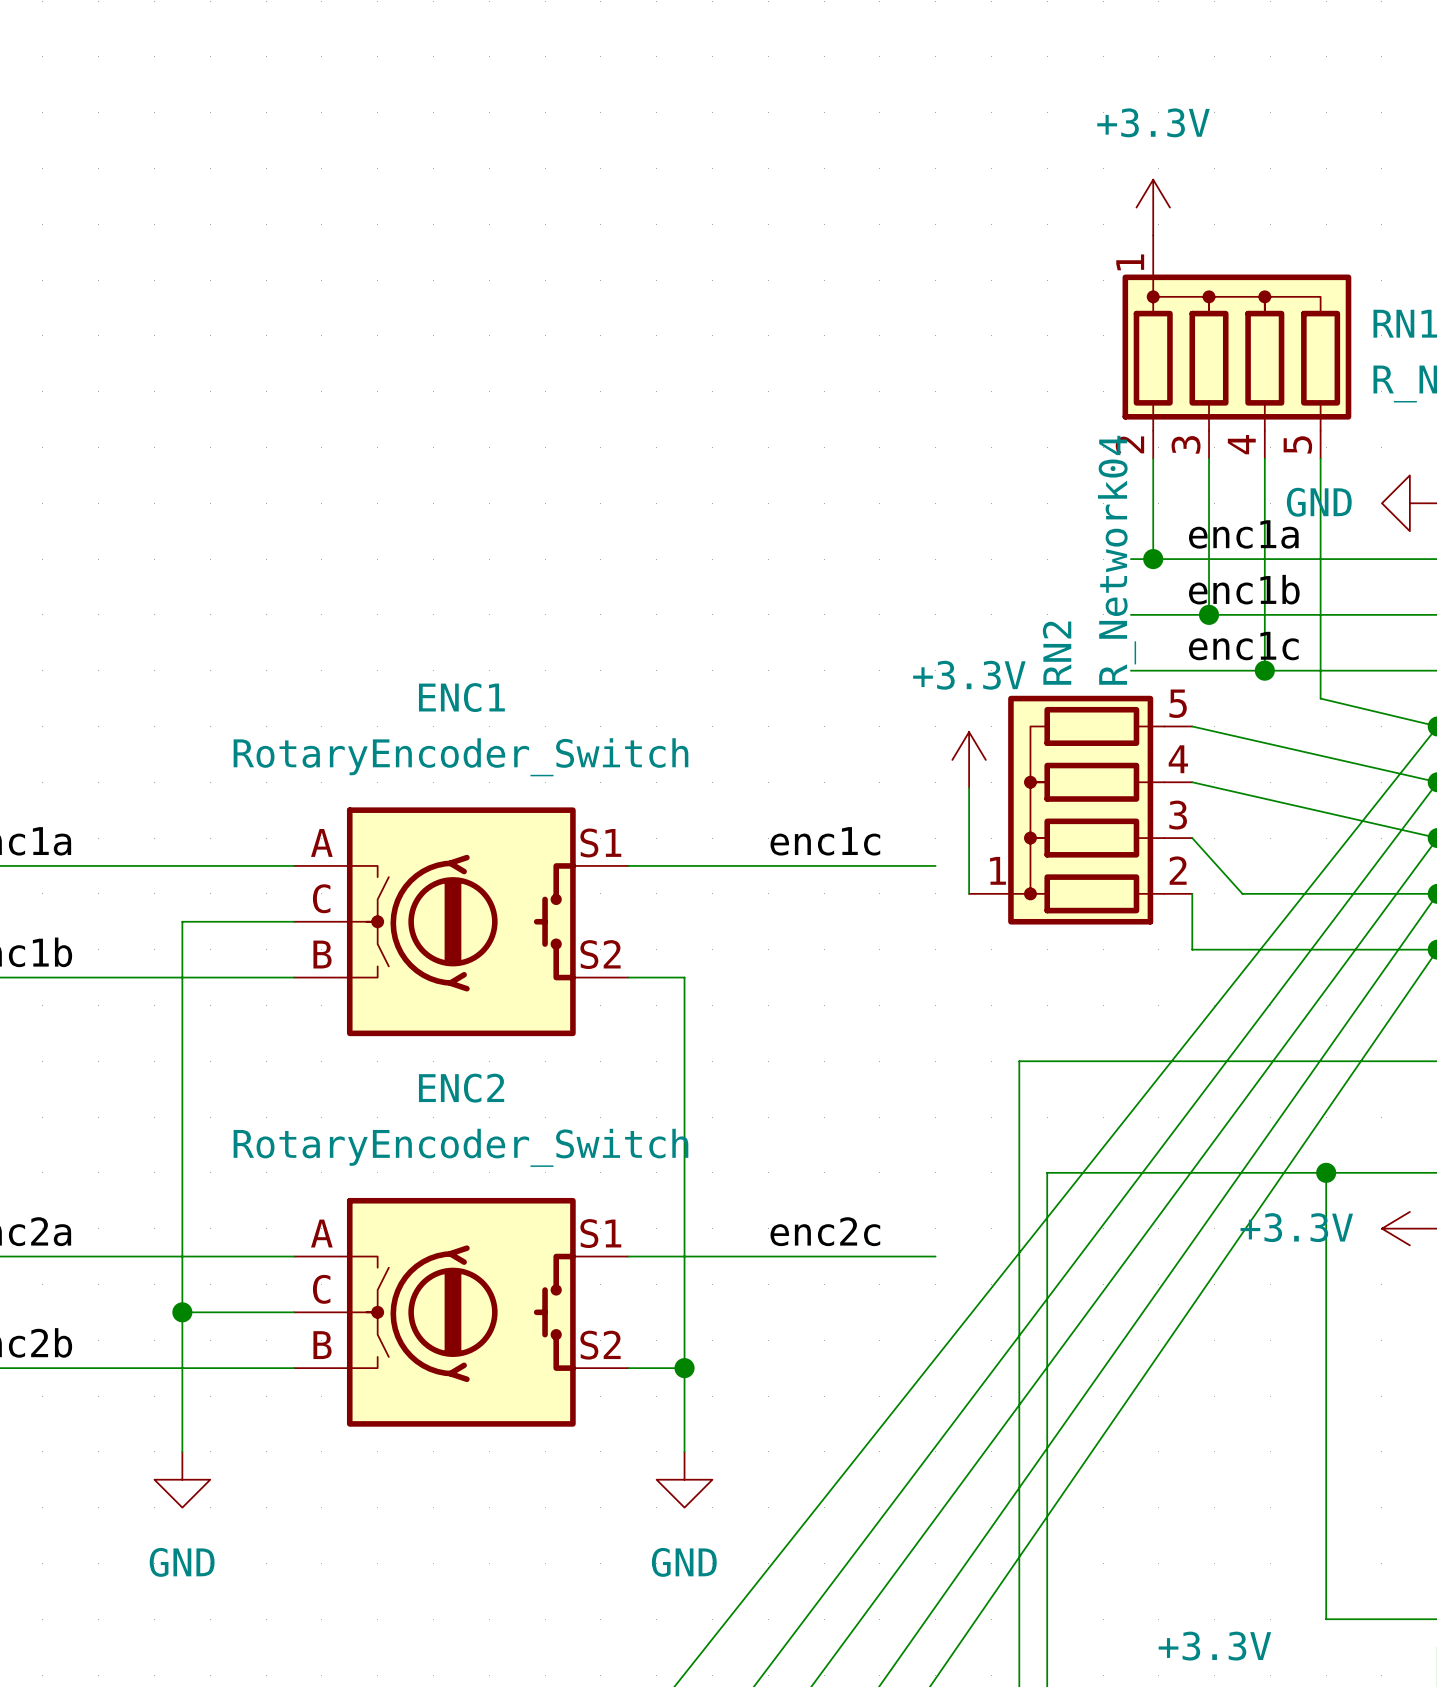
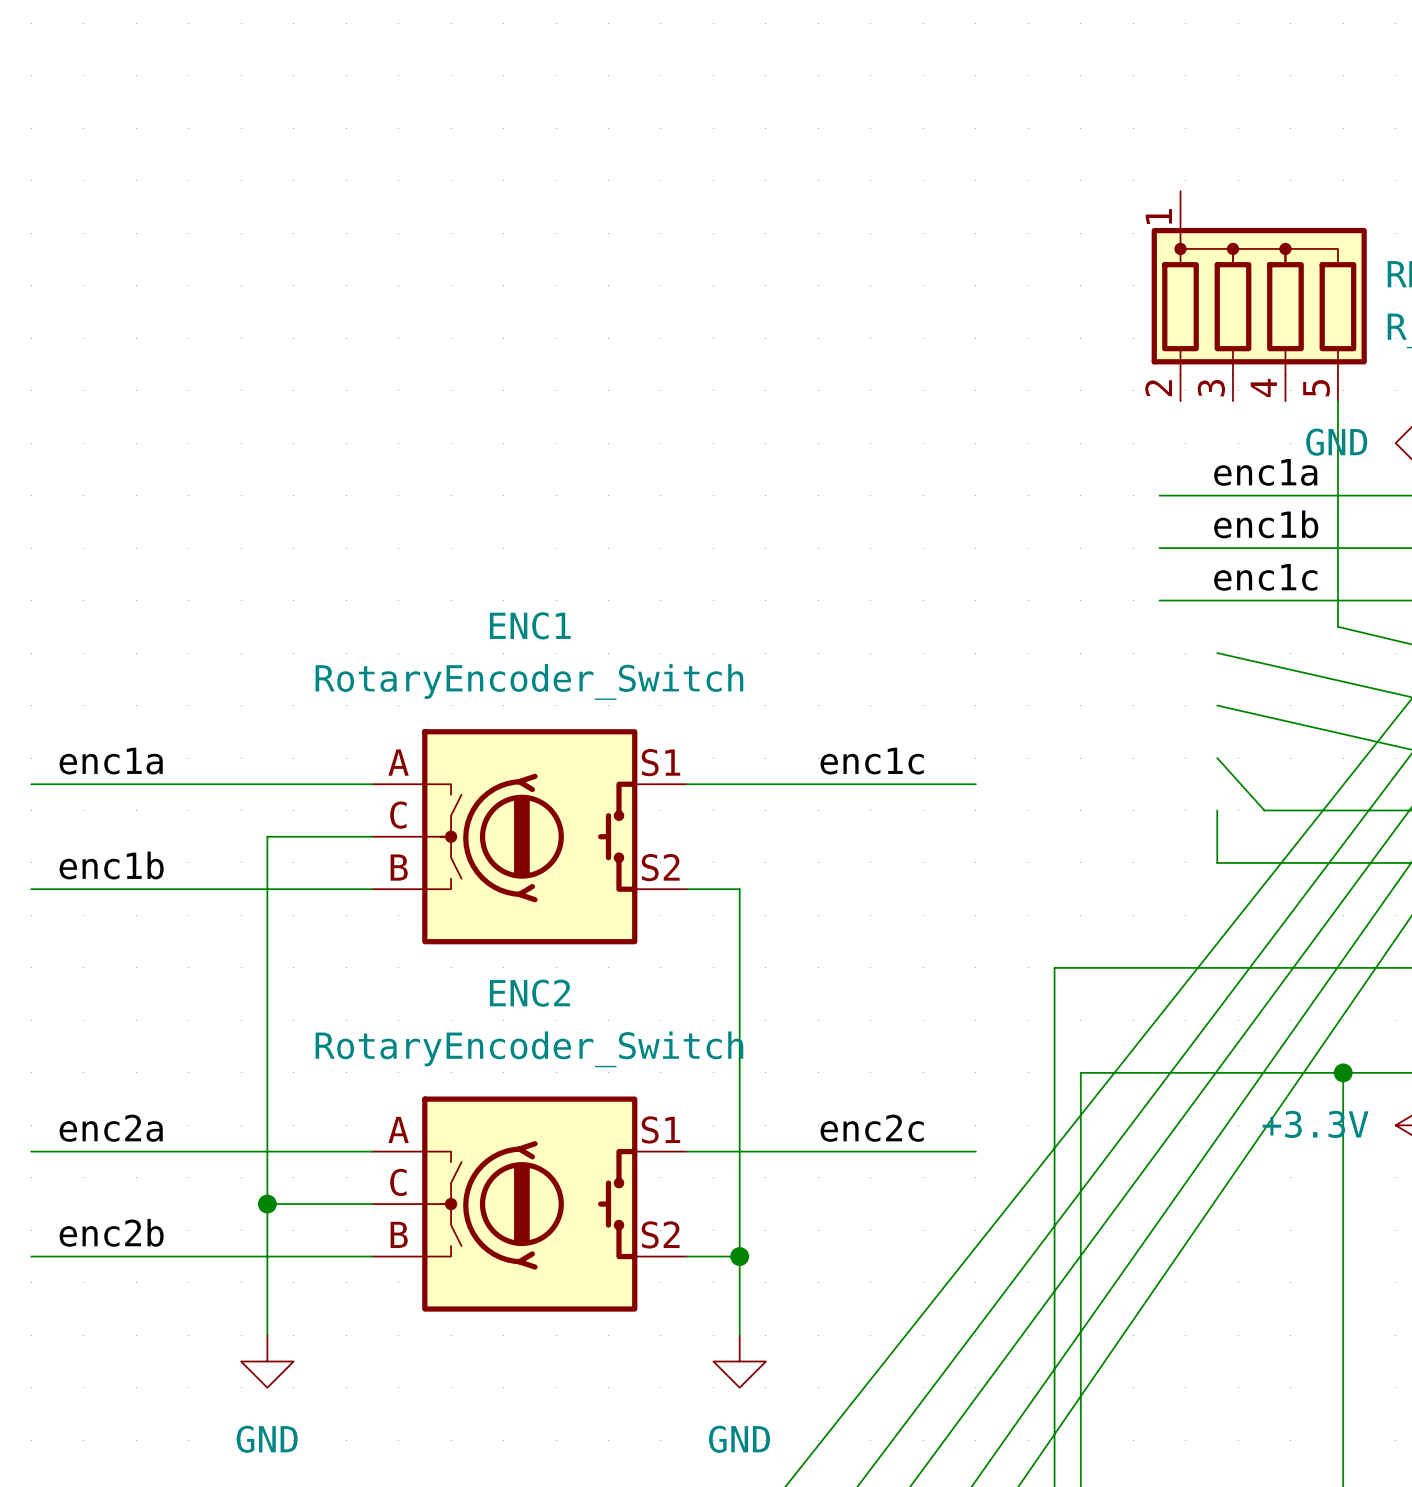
power symbol: +3.3V (1153, 207) -> none
wire: (1153, 458) (1153, 559) -> none
wire: (1209, 458) (1209, 614) -> none
wire: (1264, 458) (1264, 670) -> none
junction: (1153, 559) -> none
junction: (1209, 614) -> none
junction: (1264, 670) -> none
power symbol: +3.3V (969, 759) -> none
wire: (969, 787) (969, 893) -> none
RN2: R_Network04 (1080, 810) -> none

